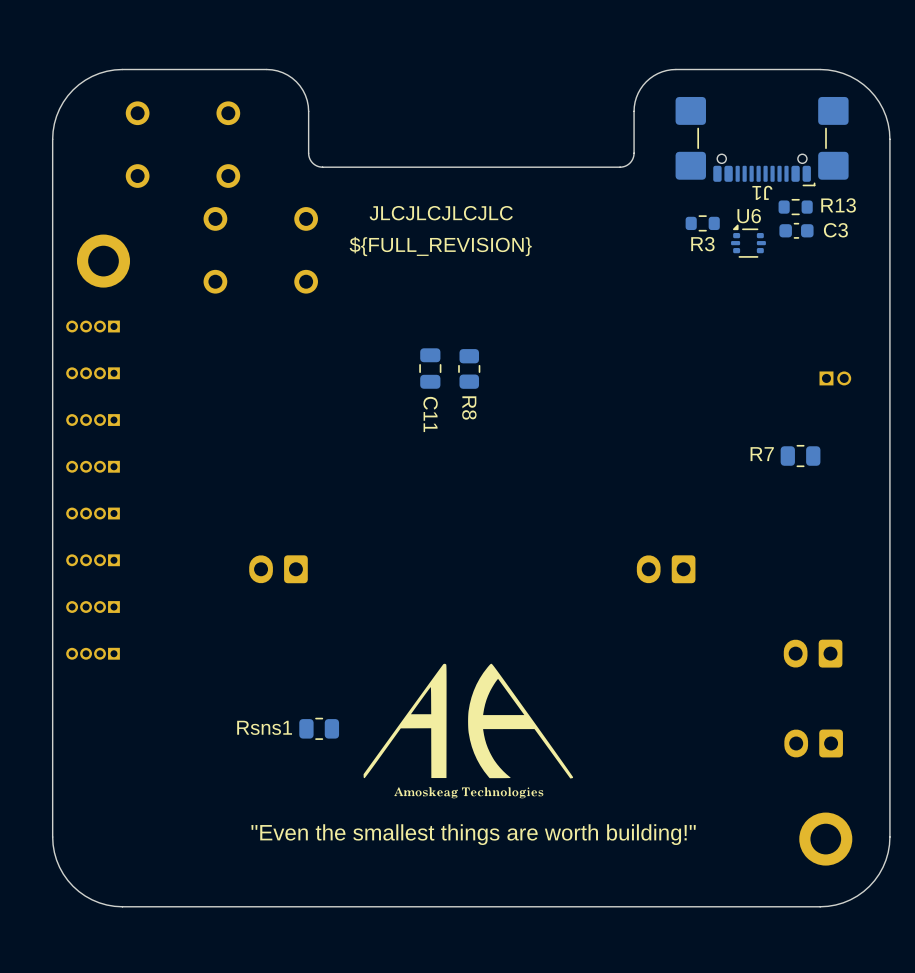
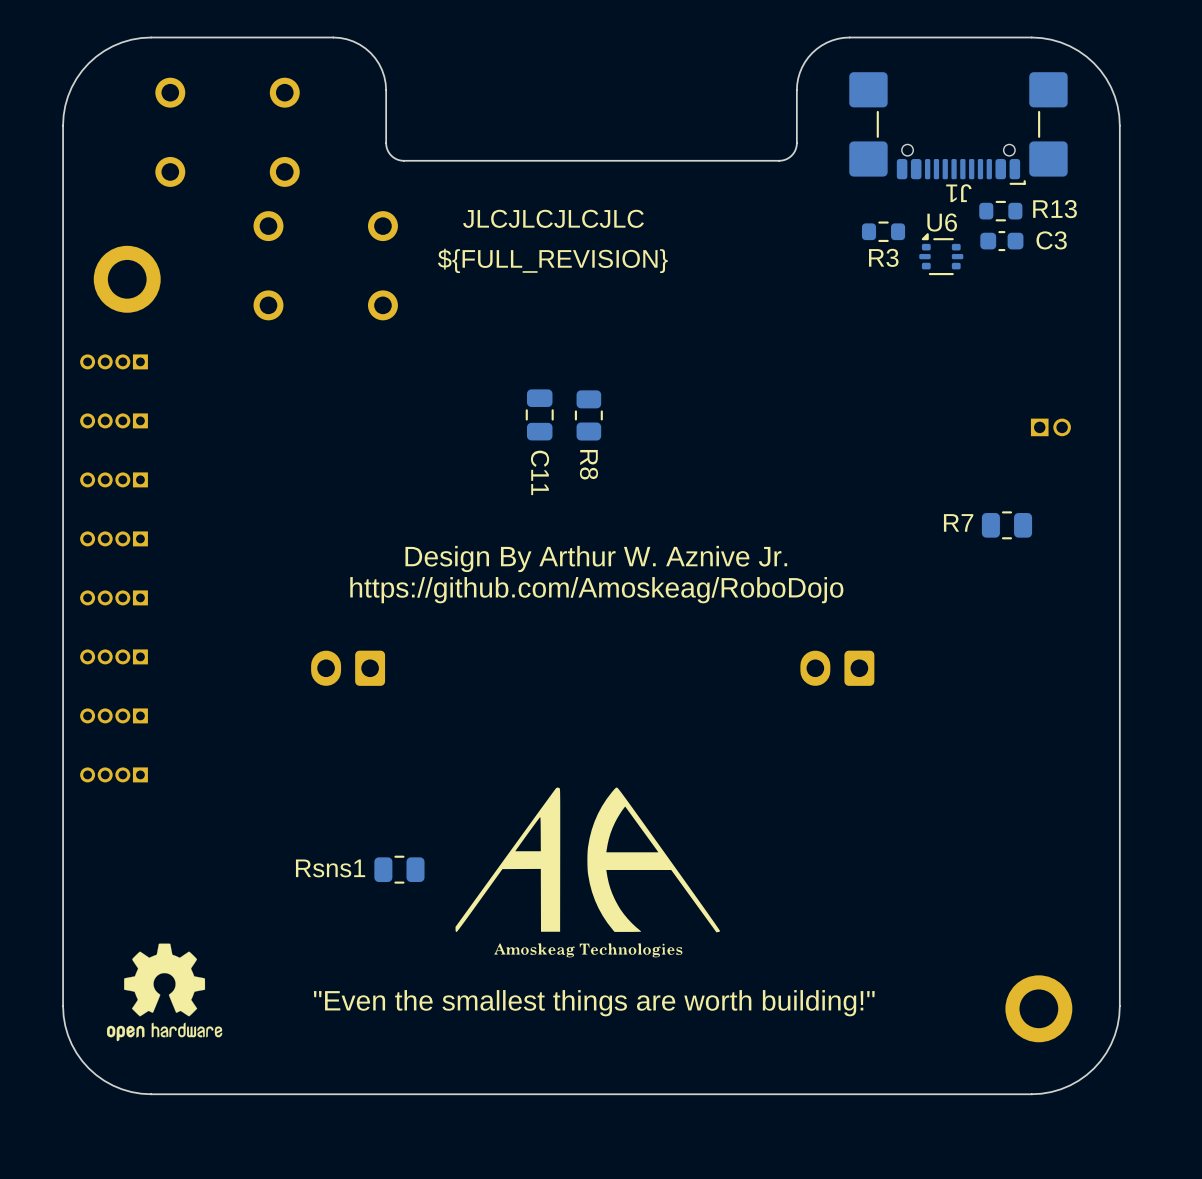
text: none -> Design By Arthur W. Aznive Jr. (596, 558)
text: none -> https://github.com/Amoskeag/RoboDojo (596, 590)
part: (813, 653) -> none
part: (813, 743) -> none
drawing: none -> [106, 943, 223, 1042]

